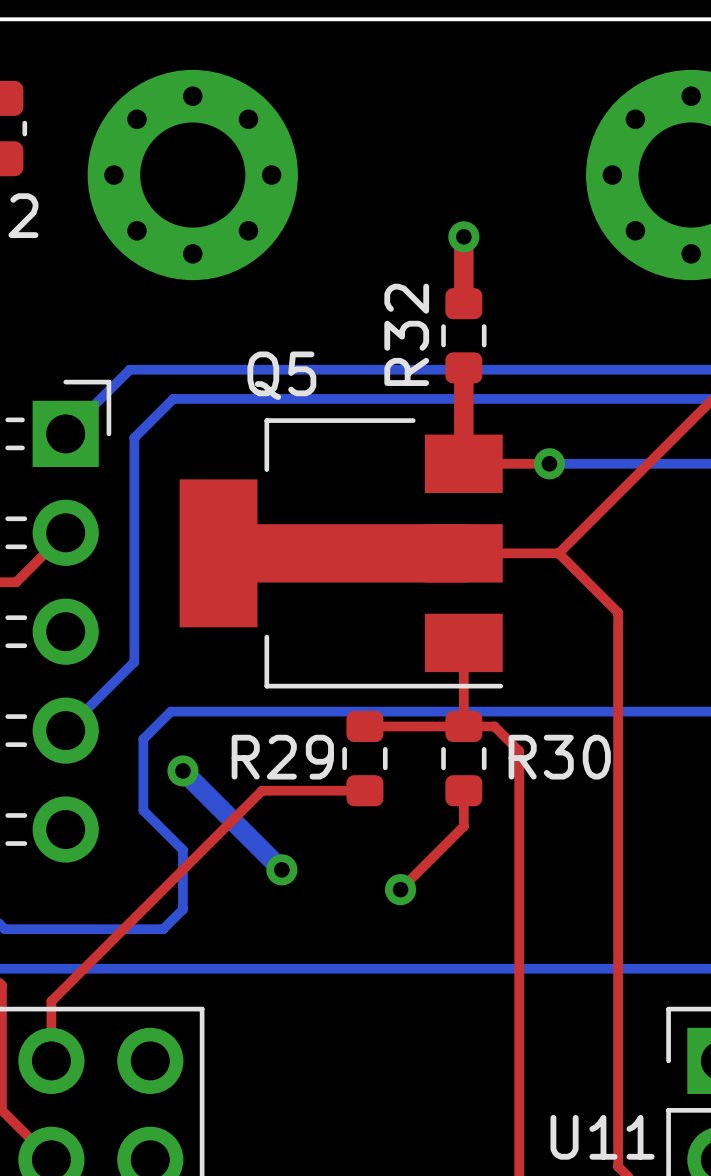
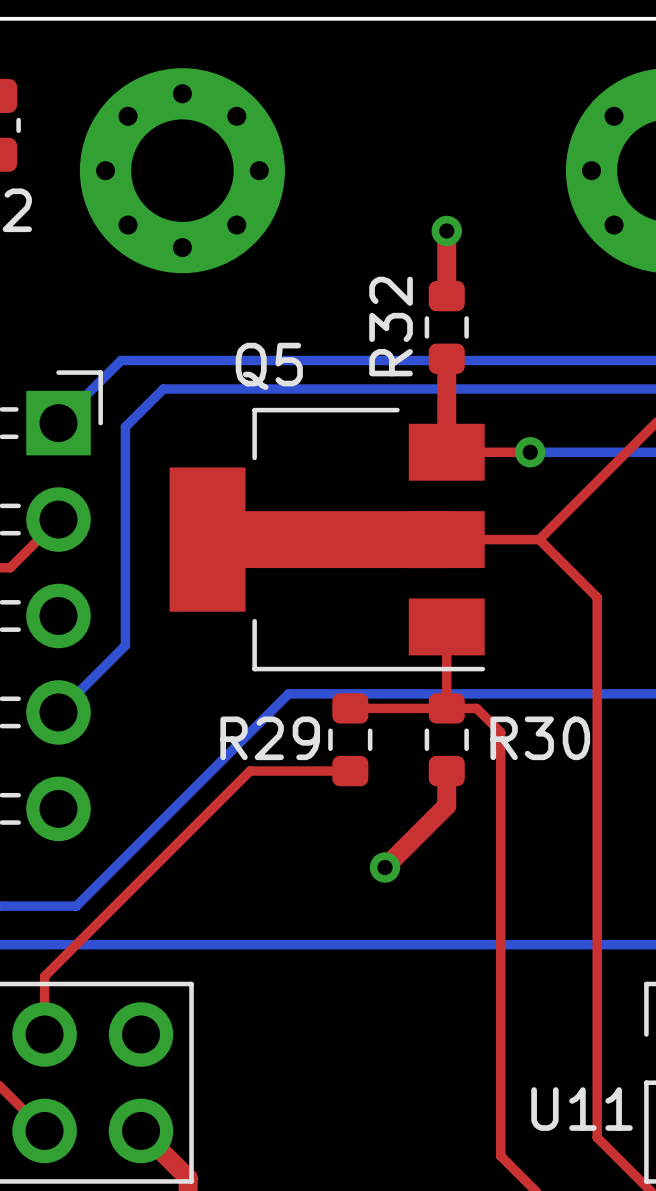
bottom track: (301, 711) (170, 711) (143, 739) (143, 810) (182, 850) (182, 909) (163, 929) (84, 929) -> (288, 693) (76, 906)
bottom track: (182, 770) (281, 869) -> none
via: (182, 770) -> none
top track width: thin (463, 790) (463, 826) (400, 889) -> thick (446, 771) (446, 805) (385, 867)
via: (281, 869) -> none

